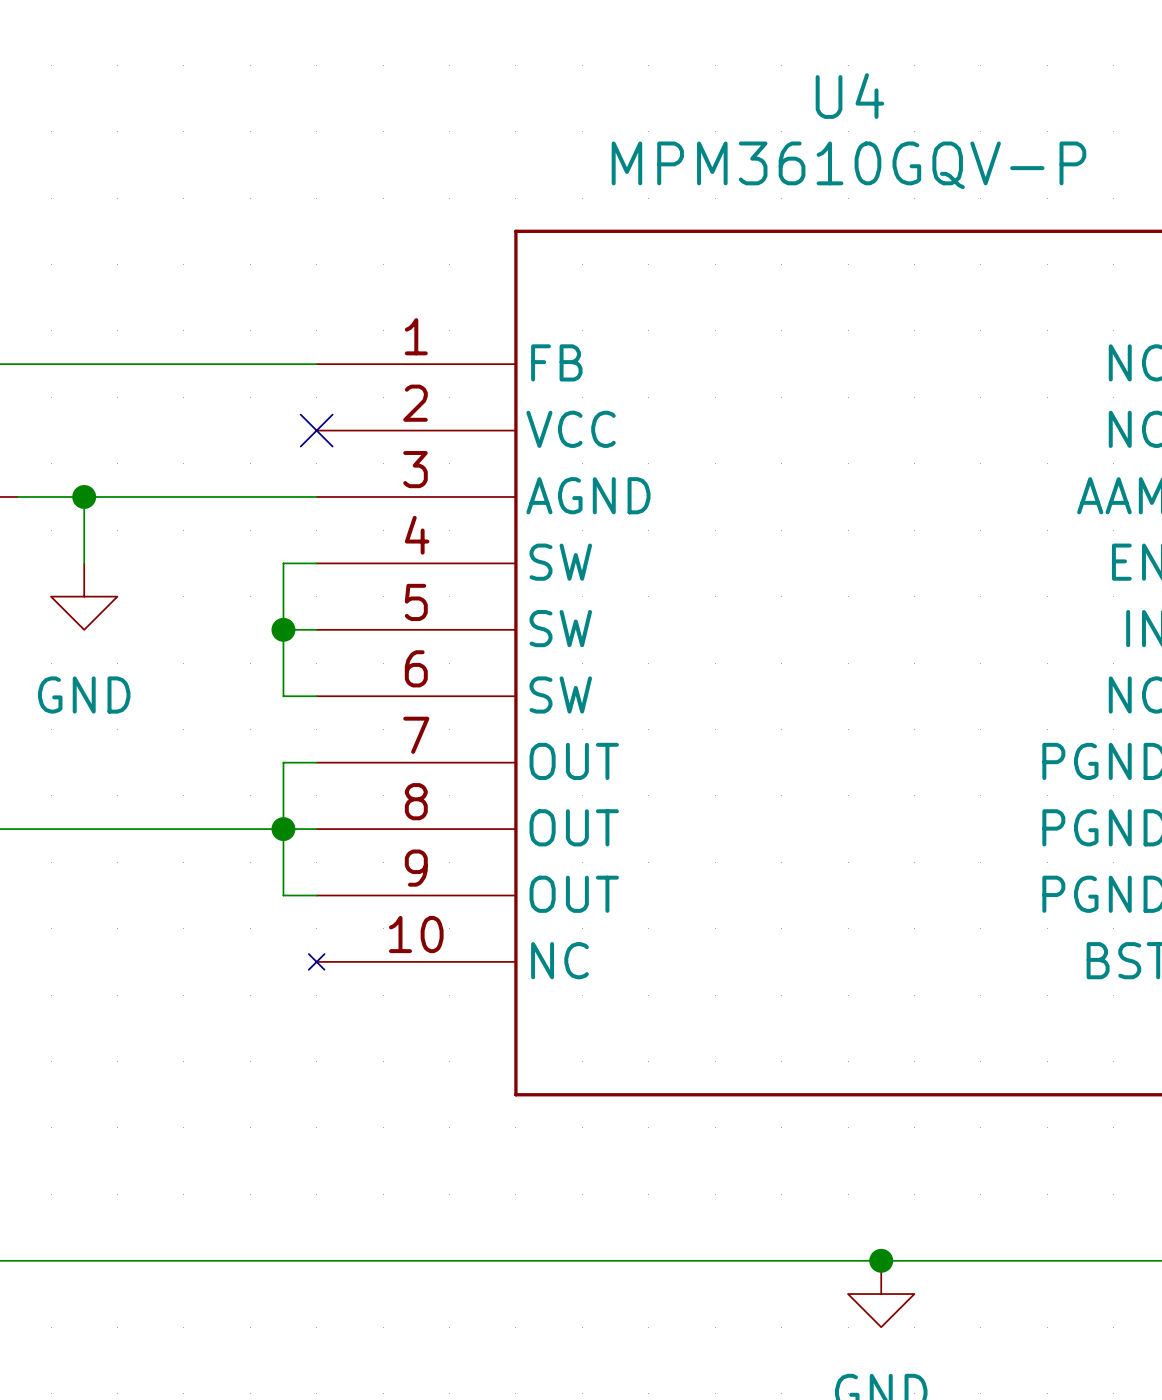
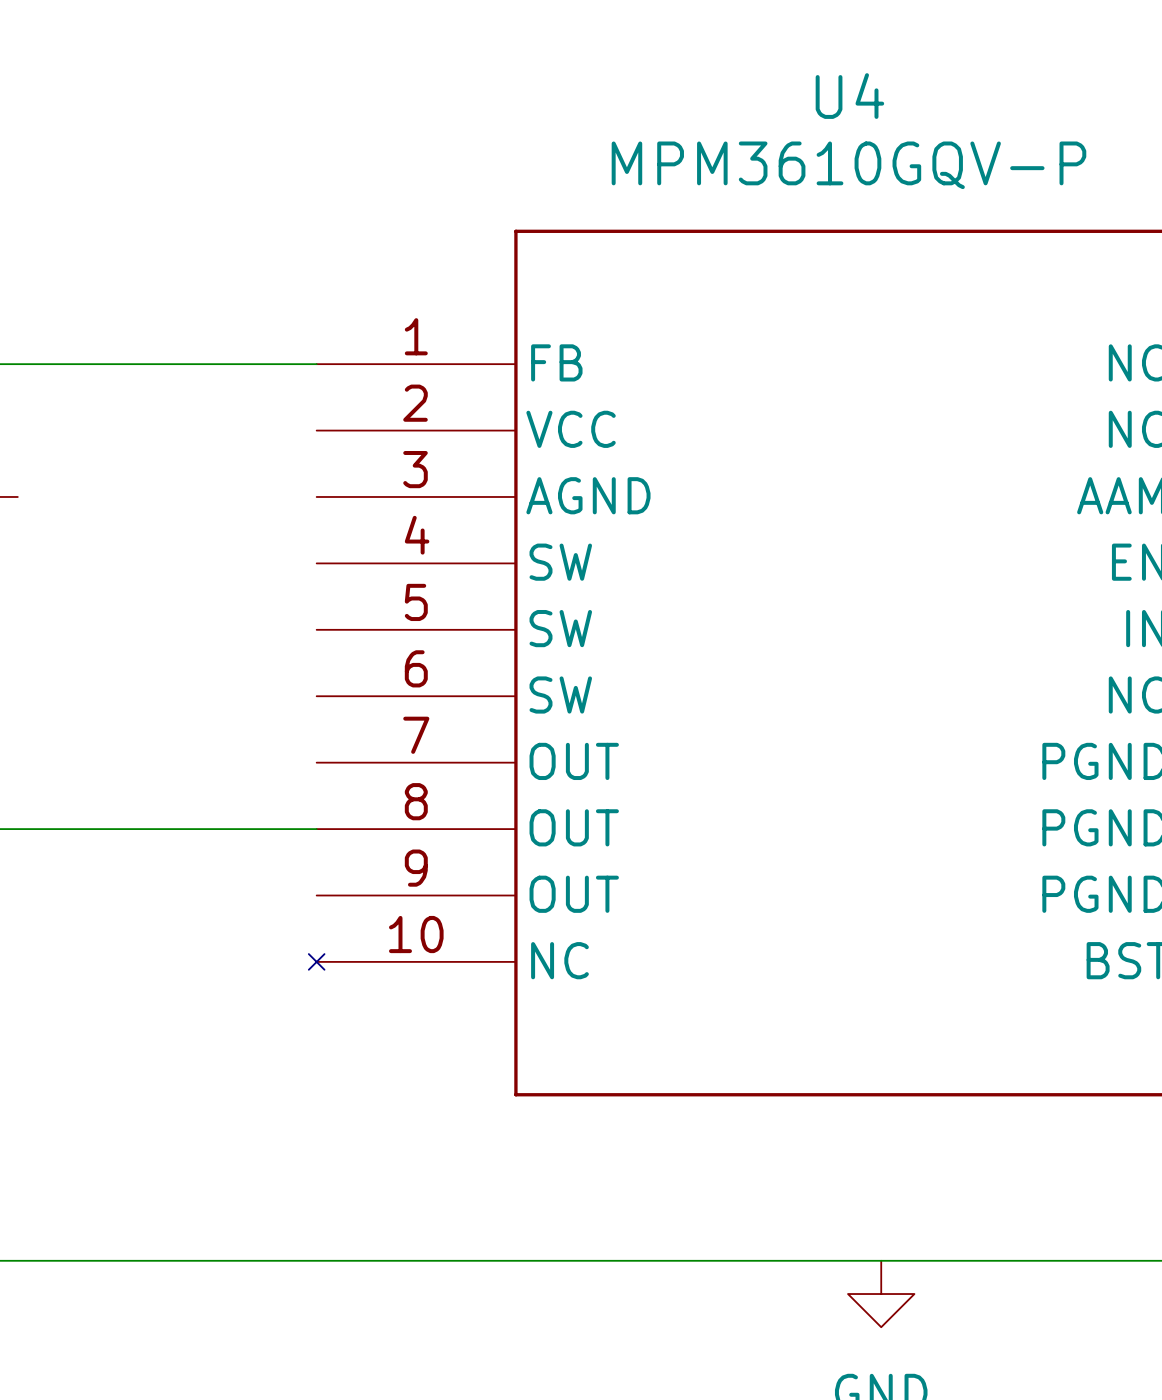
no-connect mark: (316, 430) -> none
wire: (17, 496) (316, 496) -> none
wire: (84, 496) (84, 563) -> none
junction: (84, 496) -> none
wire: (316, 563) (283, 563) (283, 696) (316, 696) -> none
power symbol: GND (84, 596) -> none
wire: (283, 629) (316, 629) -> none
junction: (283, 629) -> none
wire: (316, 762) (283, 762) (283, 895) (316, 895) -> none
junction: (283, 829) -> none
junction: (881, 1260) -> none

